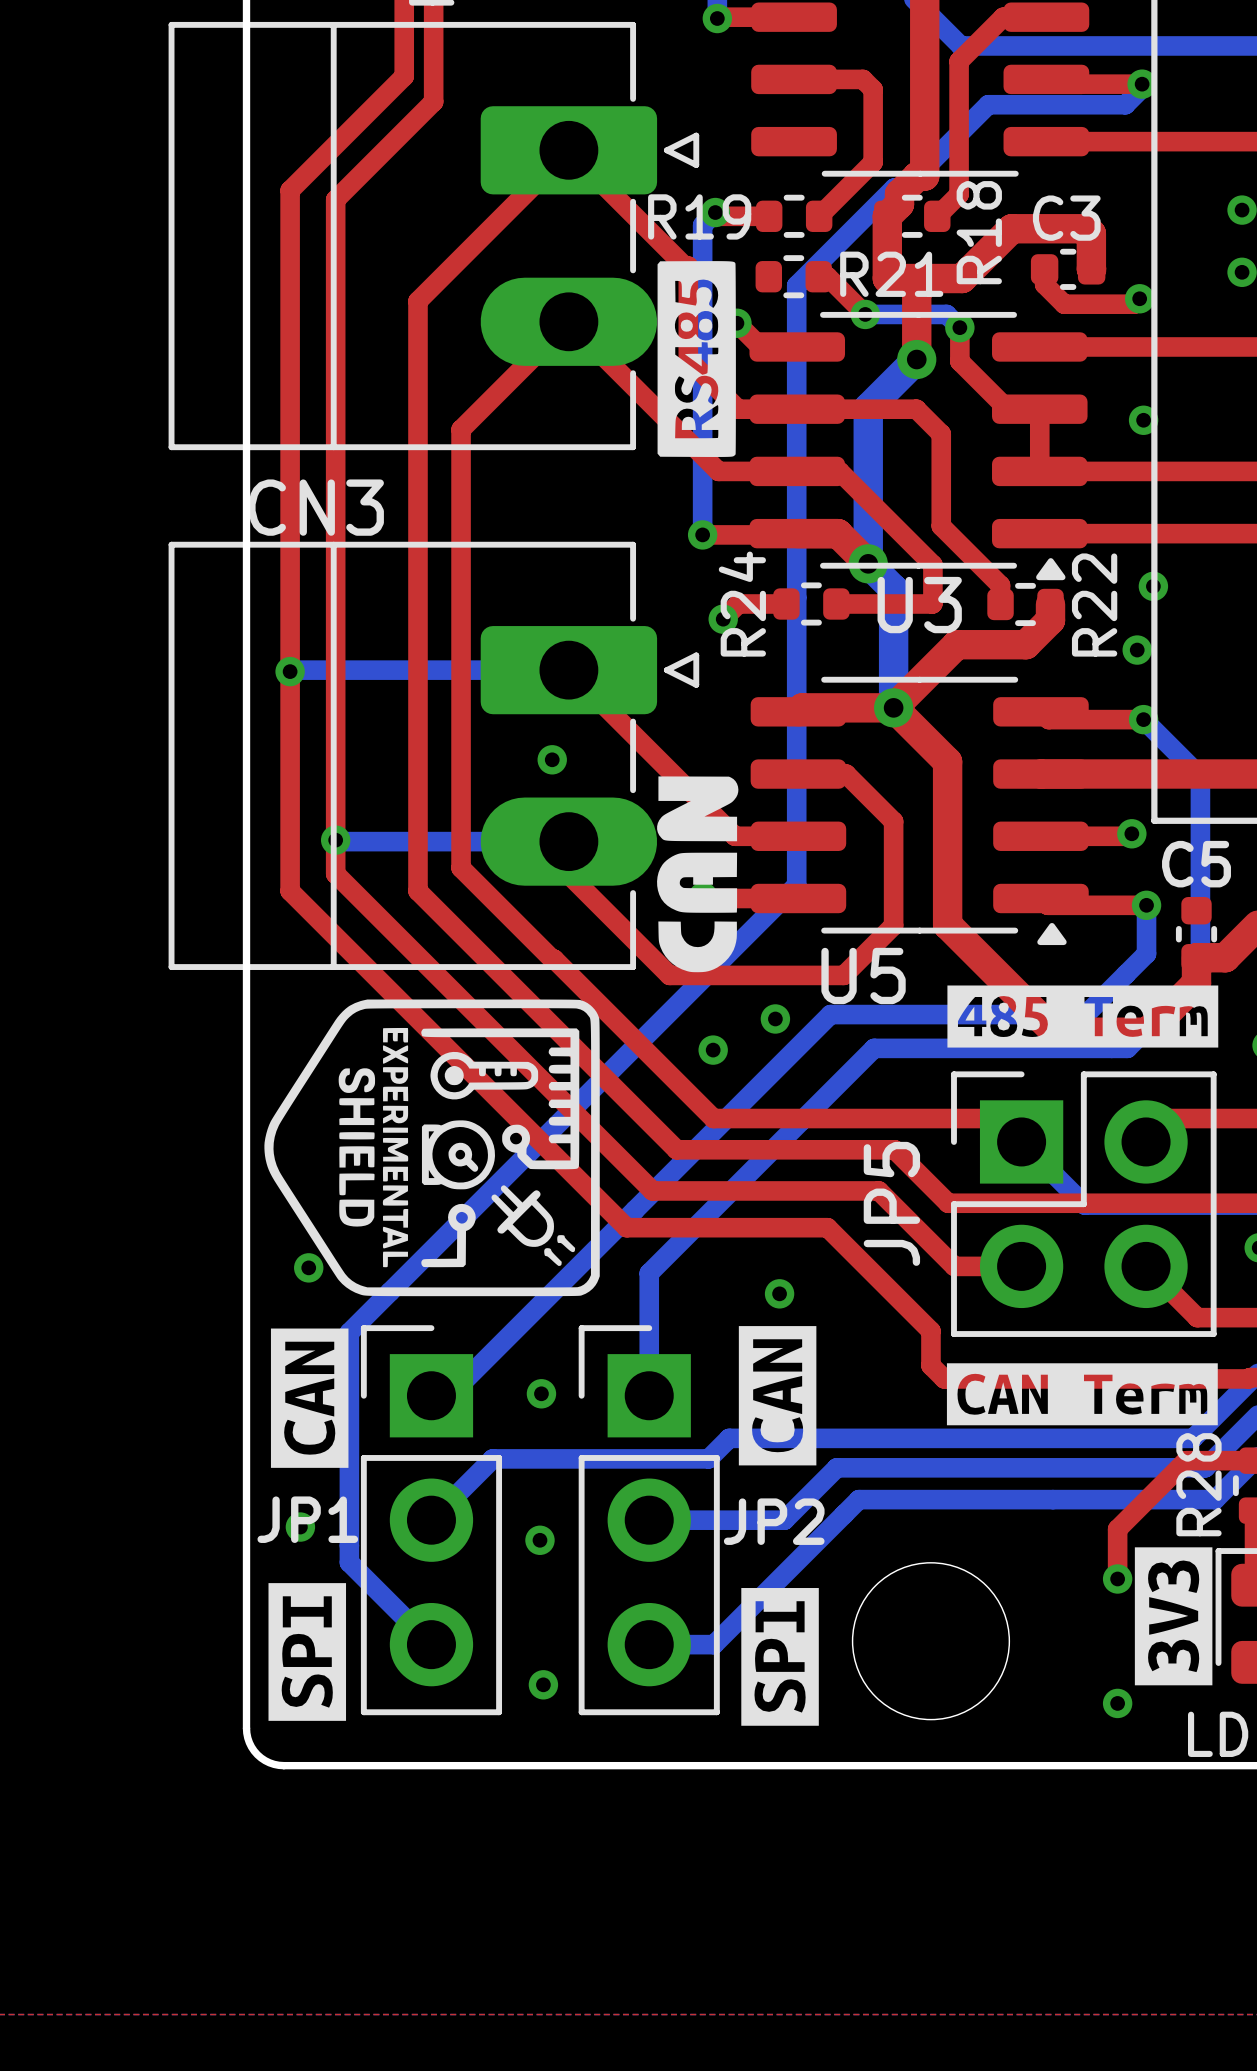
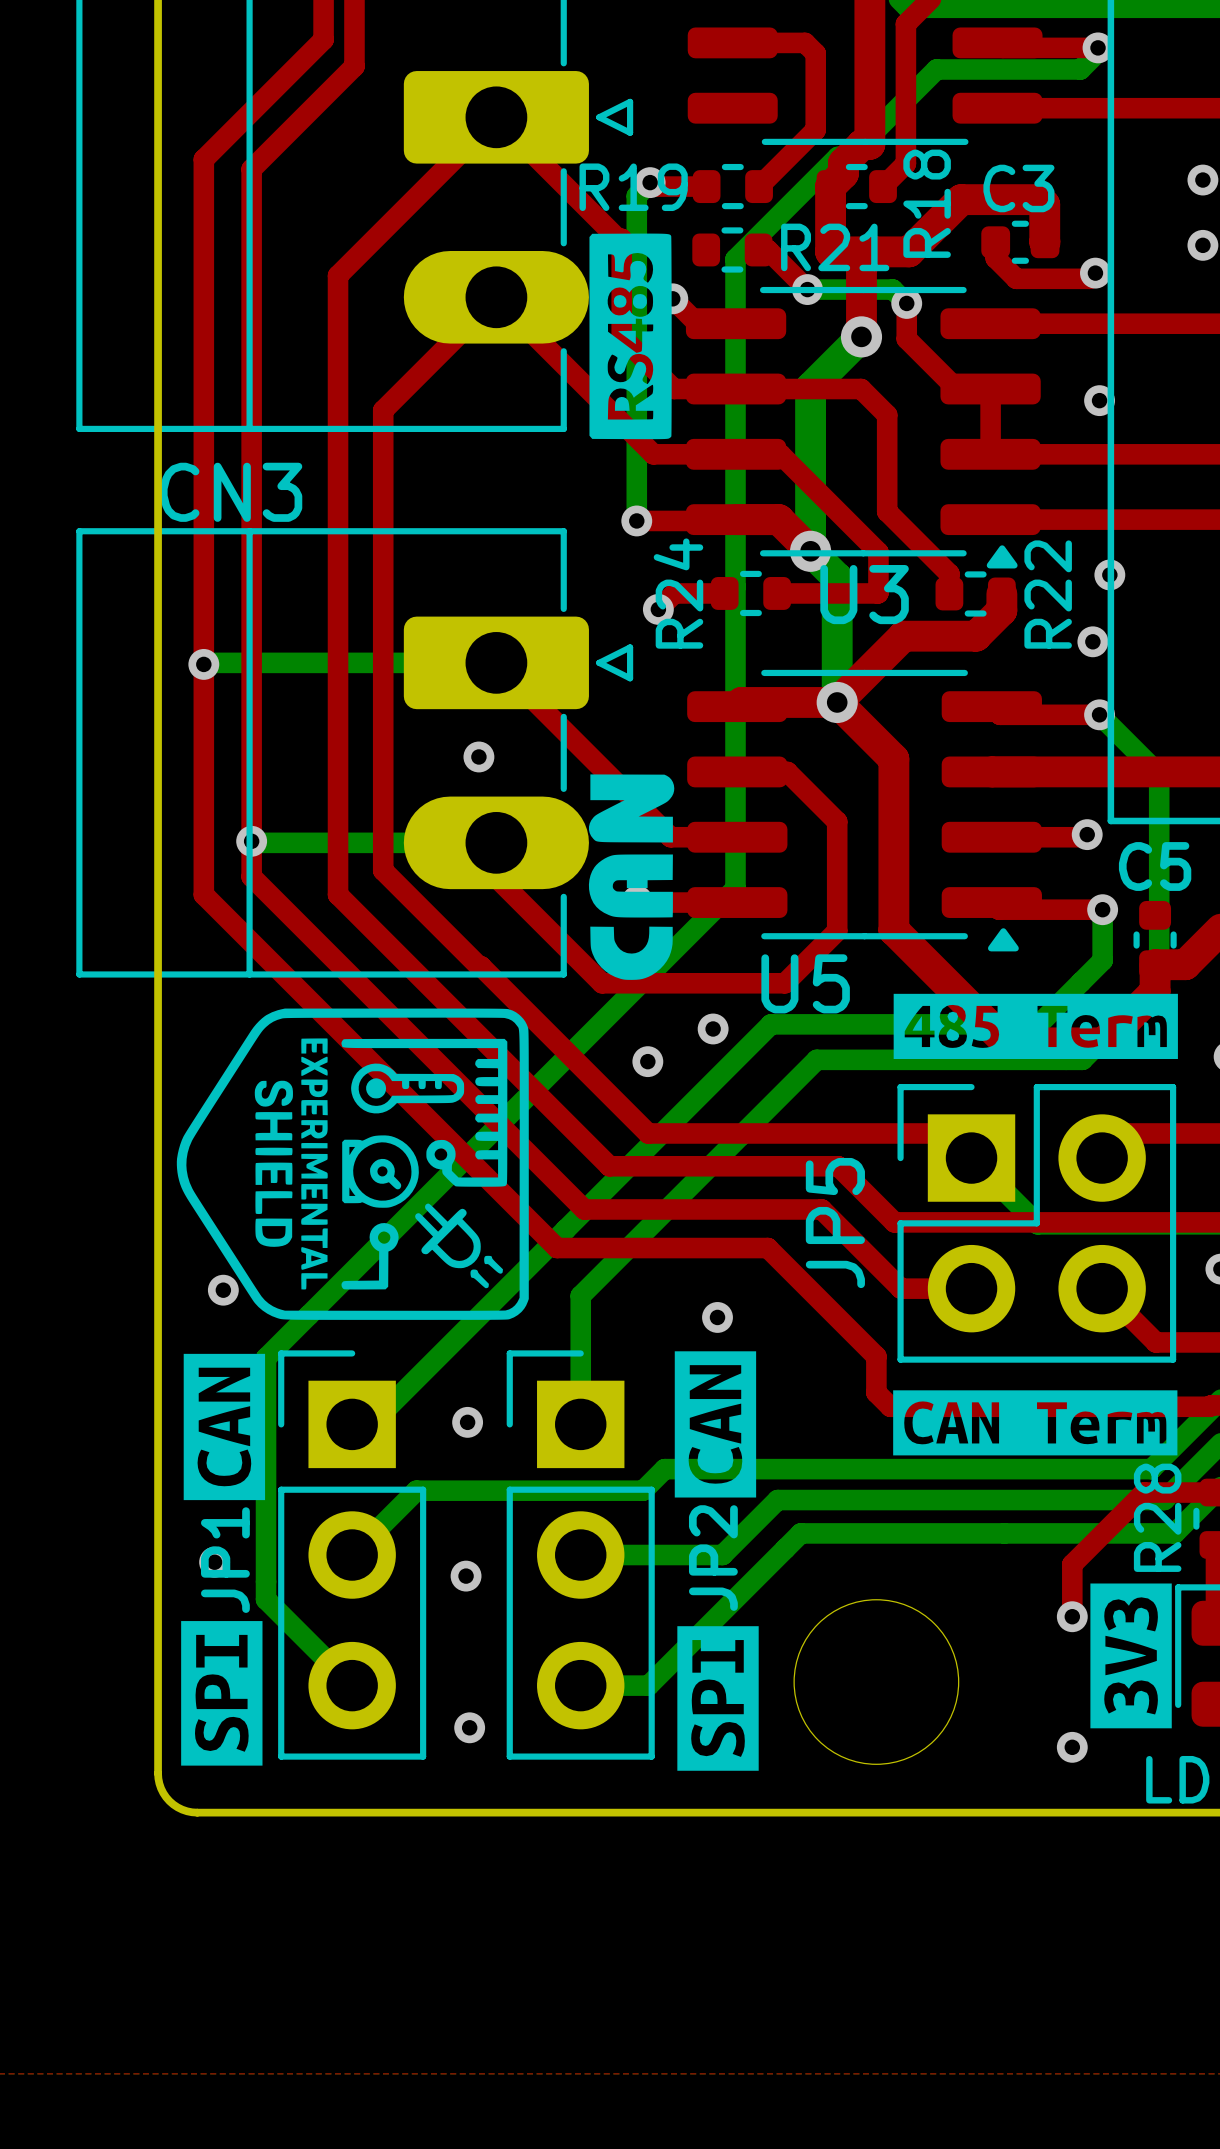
JP1 name rotation: 0° (307, 1519) -> 90° counterclockwise (225, 1560)
JP2 name rotation: 0° (774, 1521) -> 90° counterclockwise (713, 1558)

